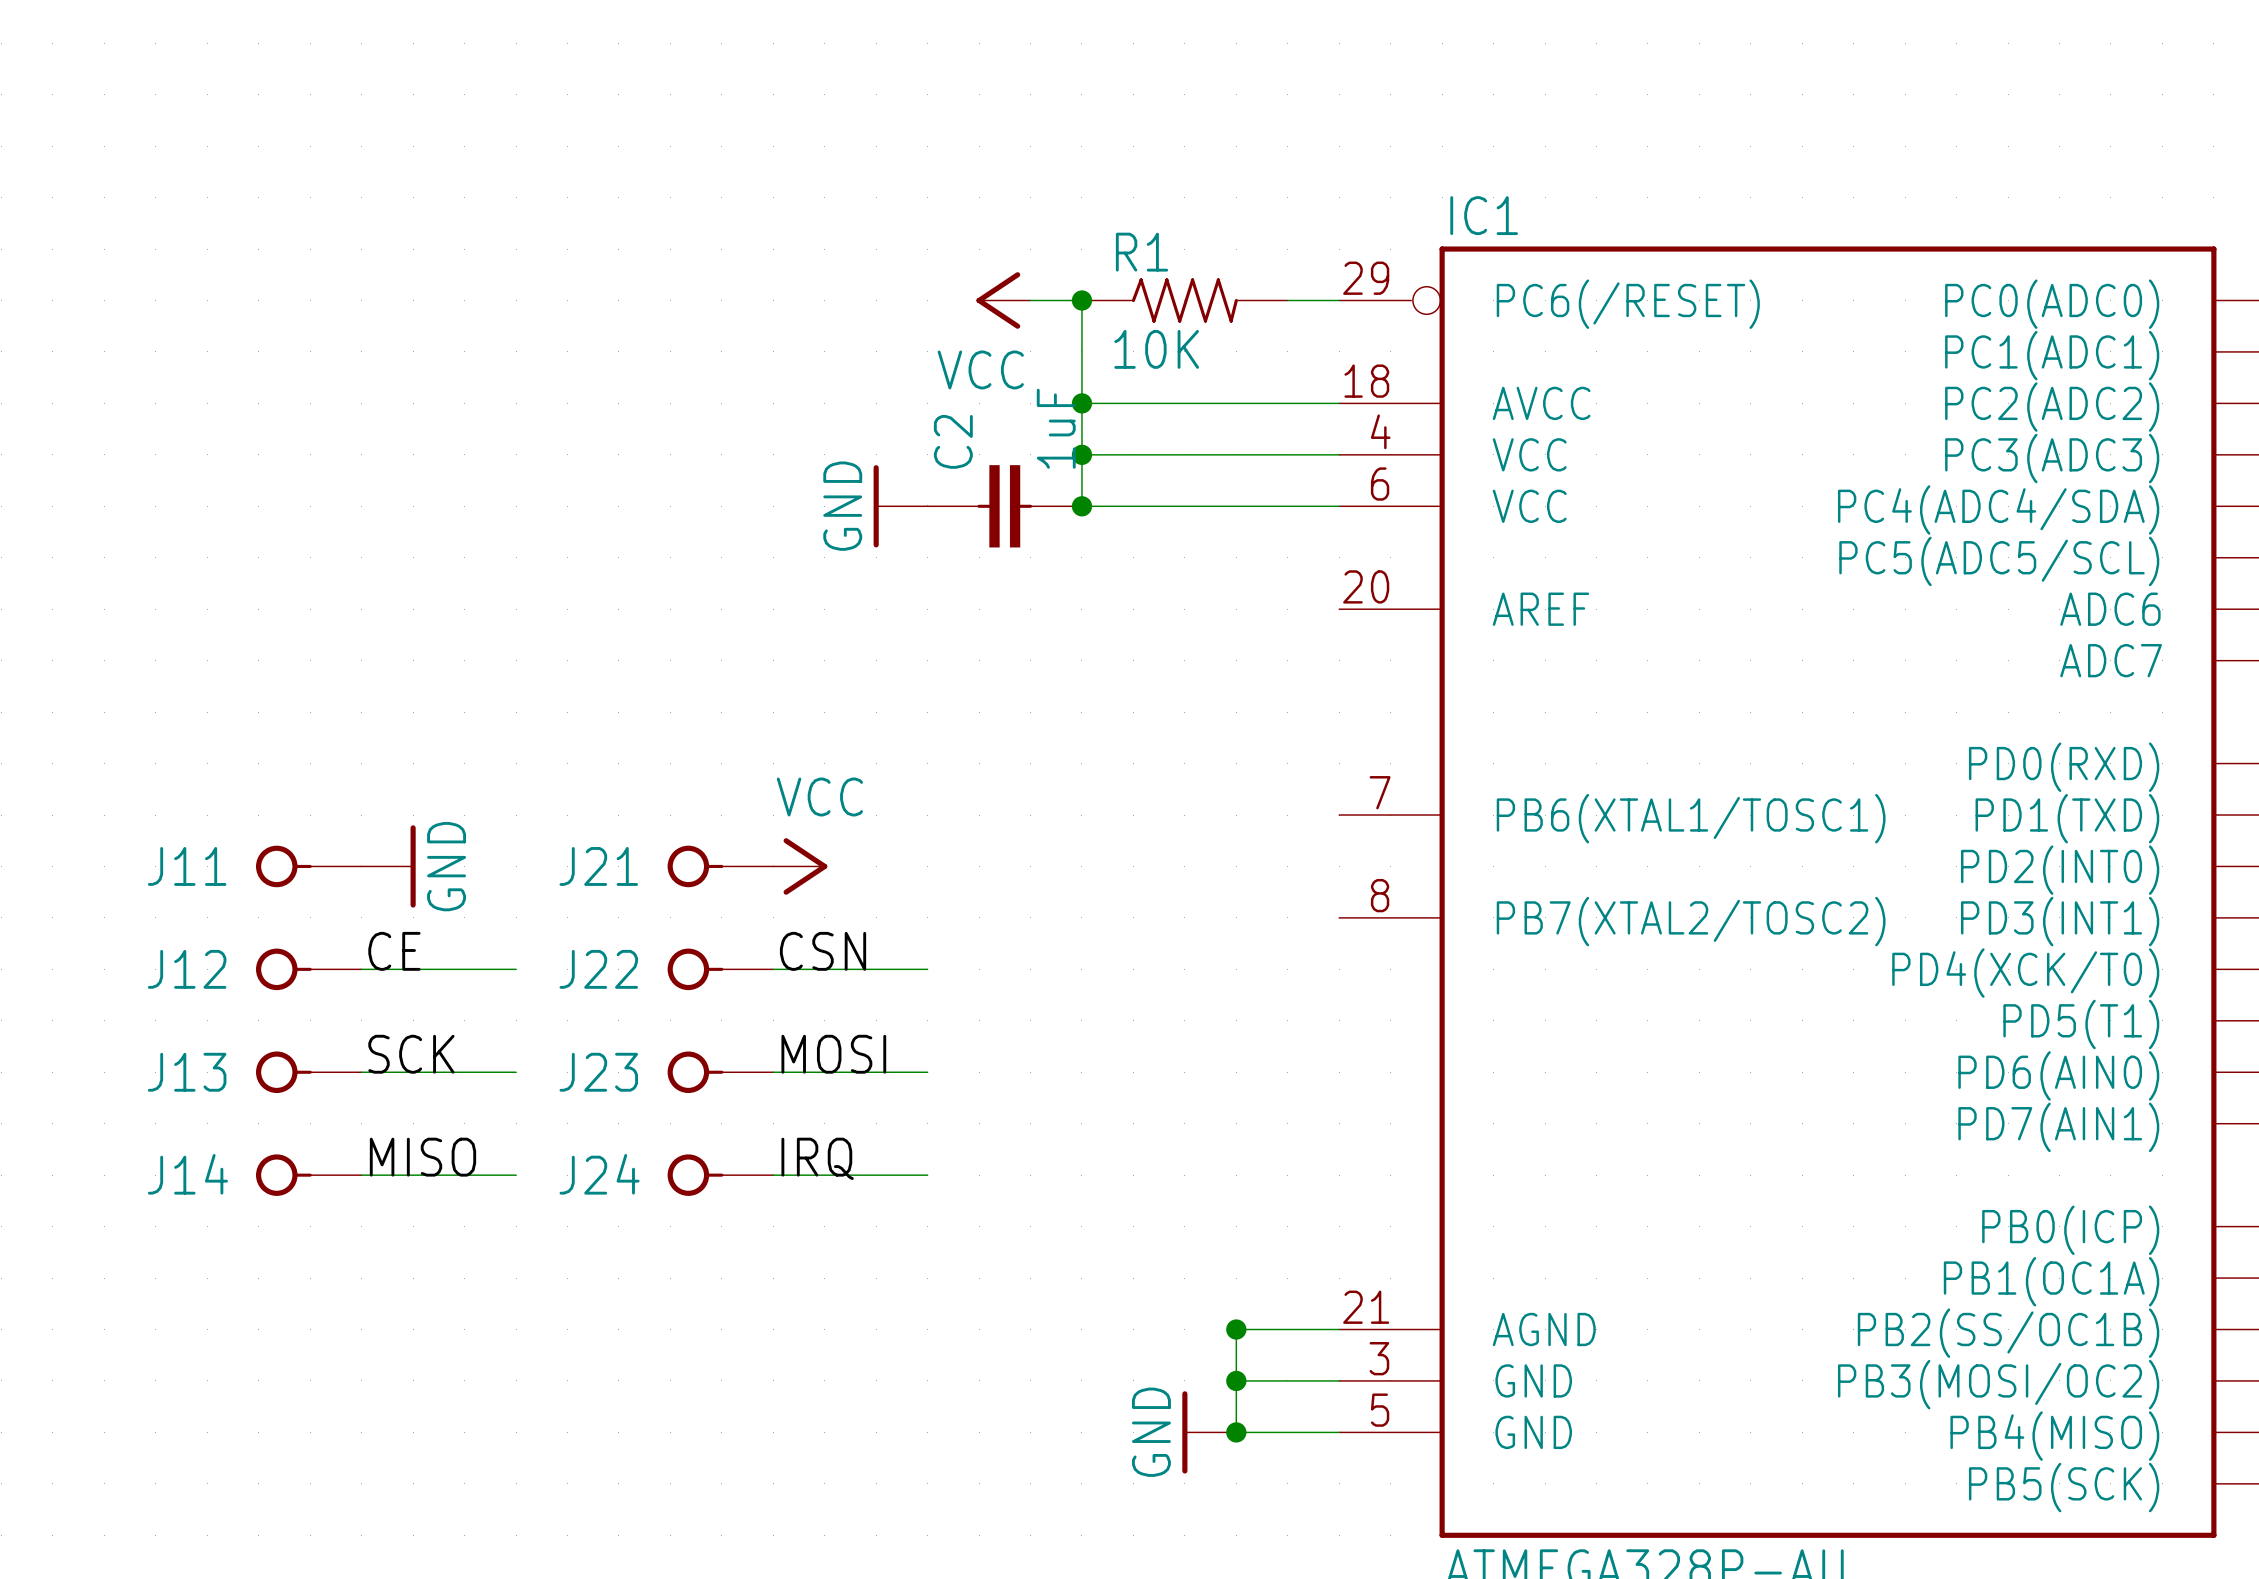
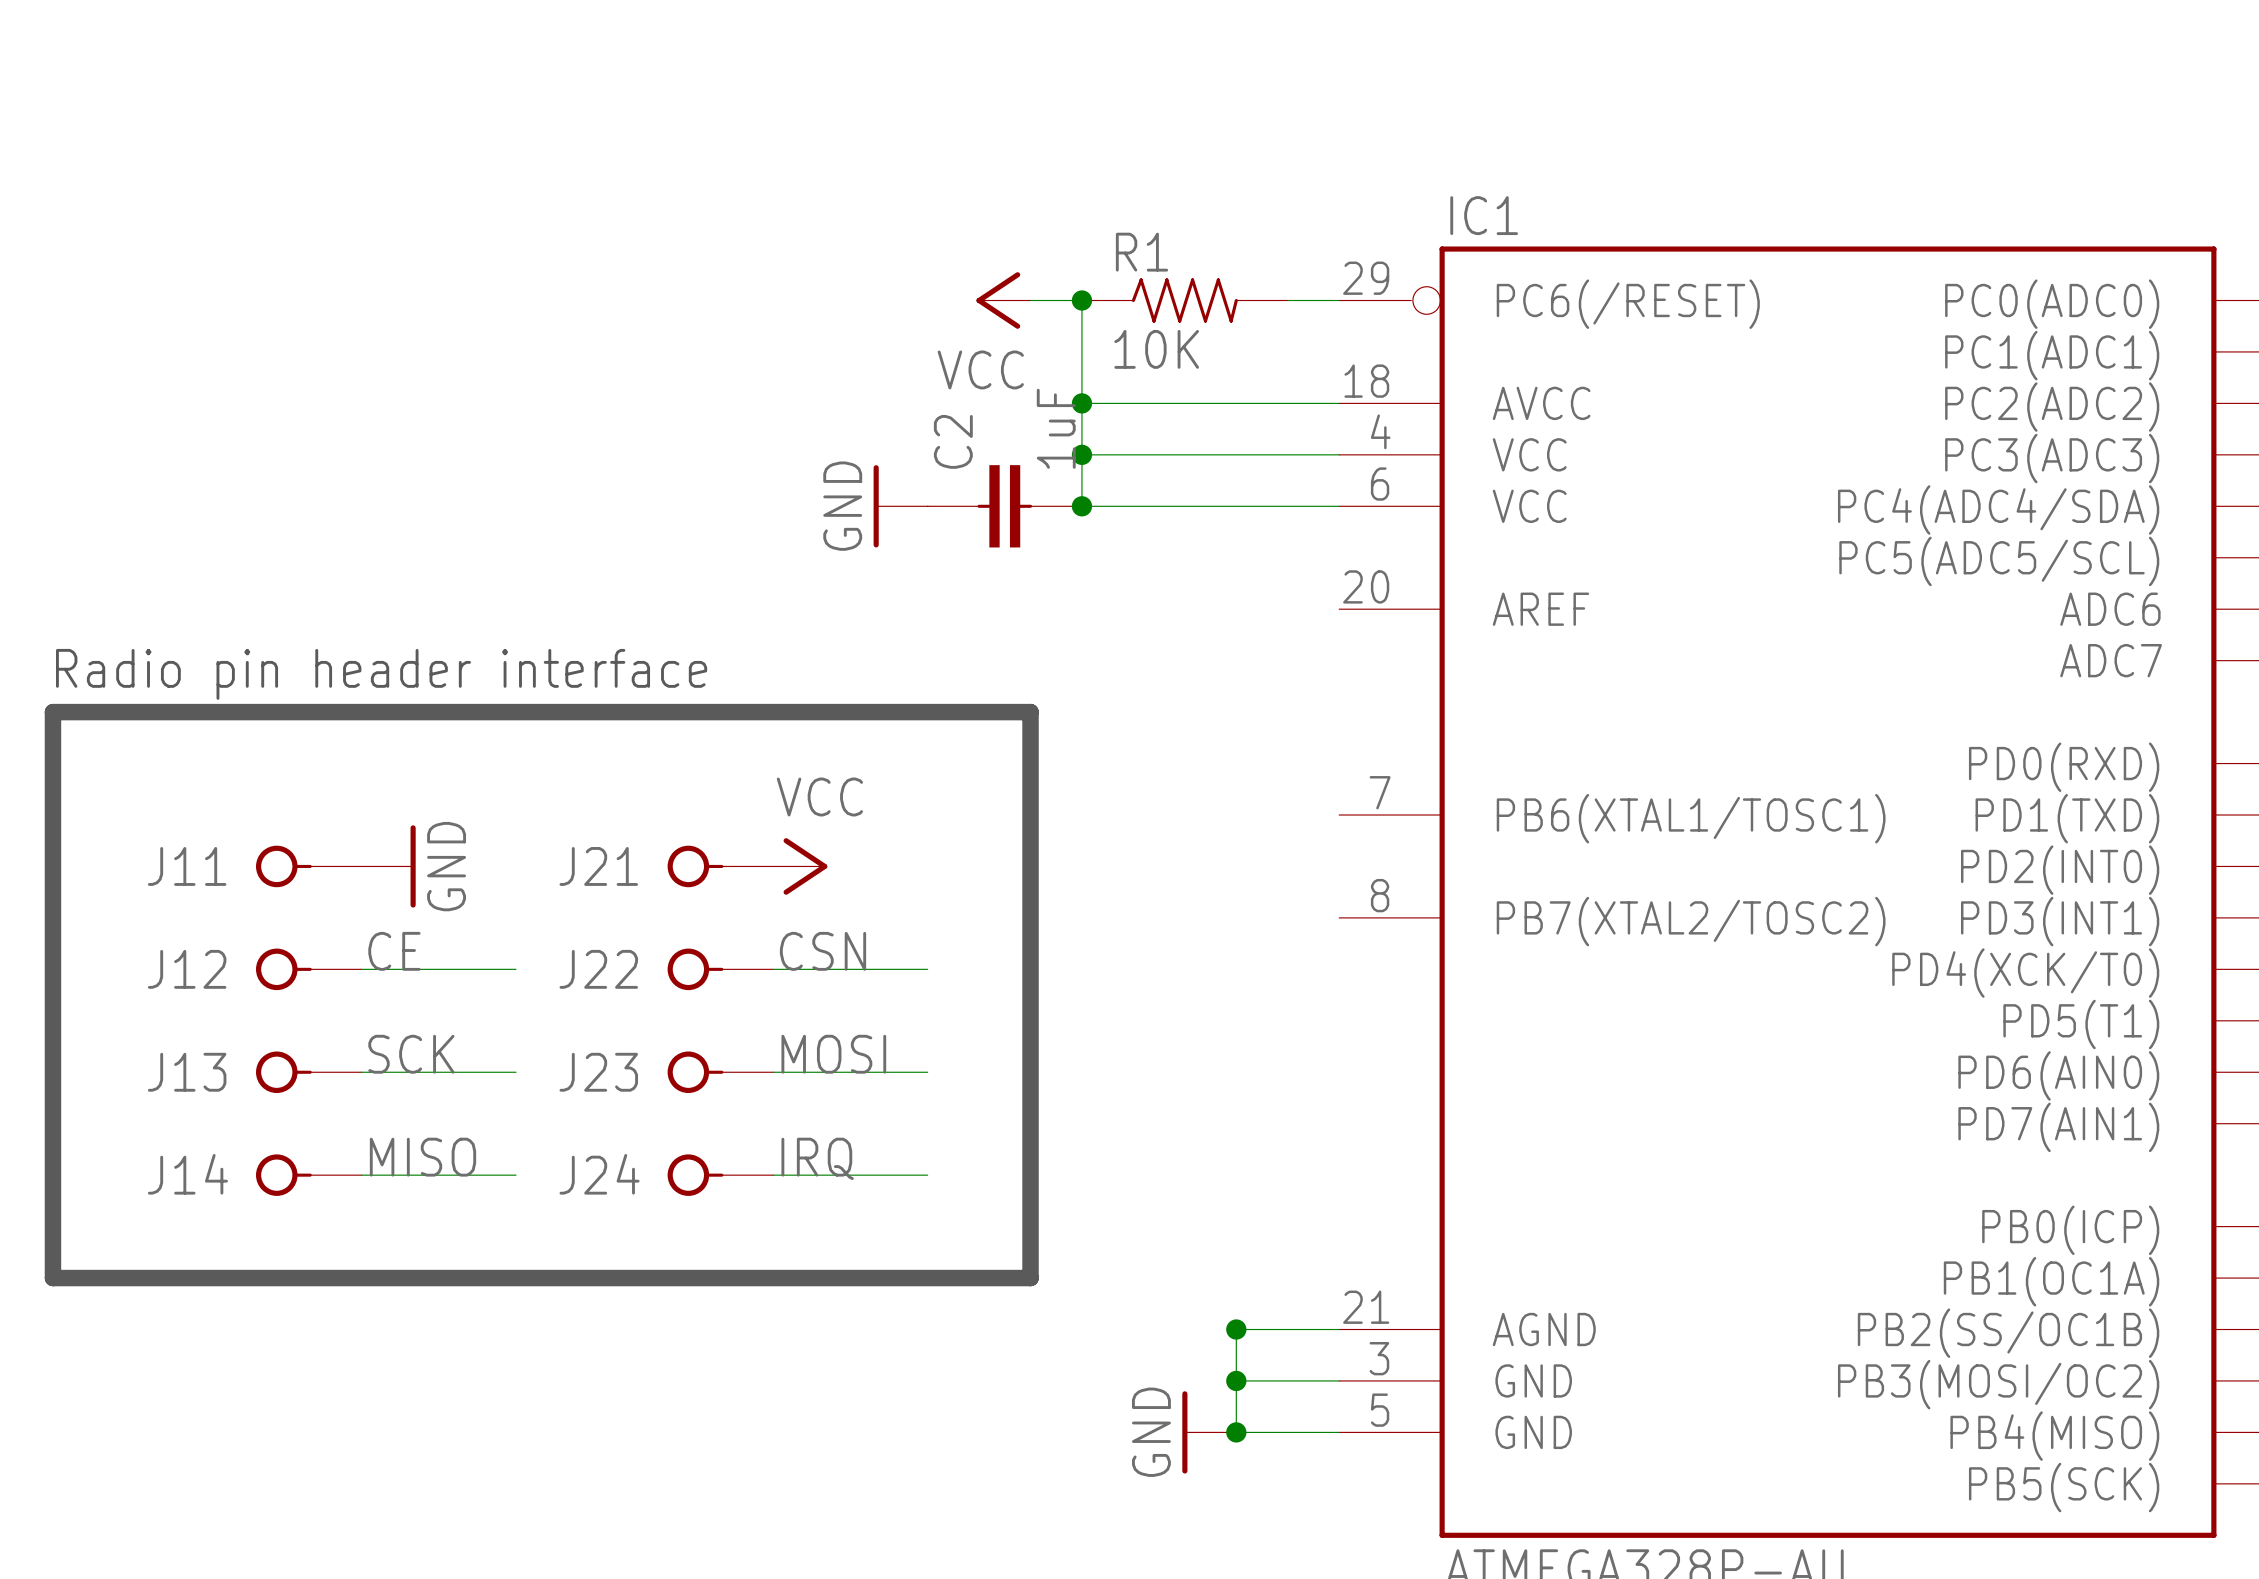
text: none -> Radio pin header interface (381, 674)
line: none -> (52, 712) (1030, 712) (1030, 1278) (52, 1278) (52, 712)

